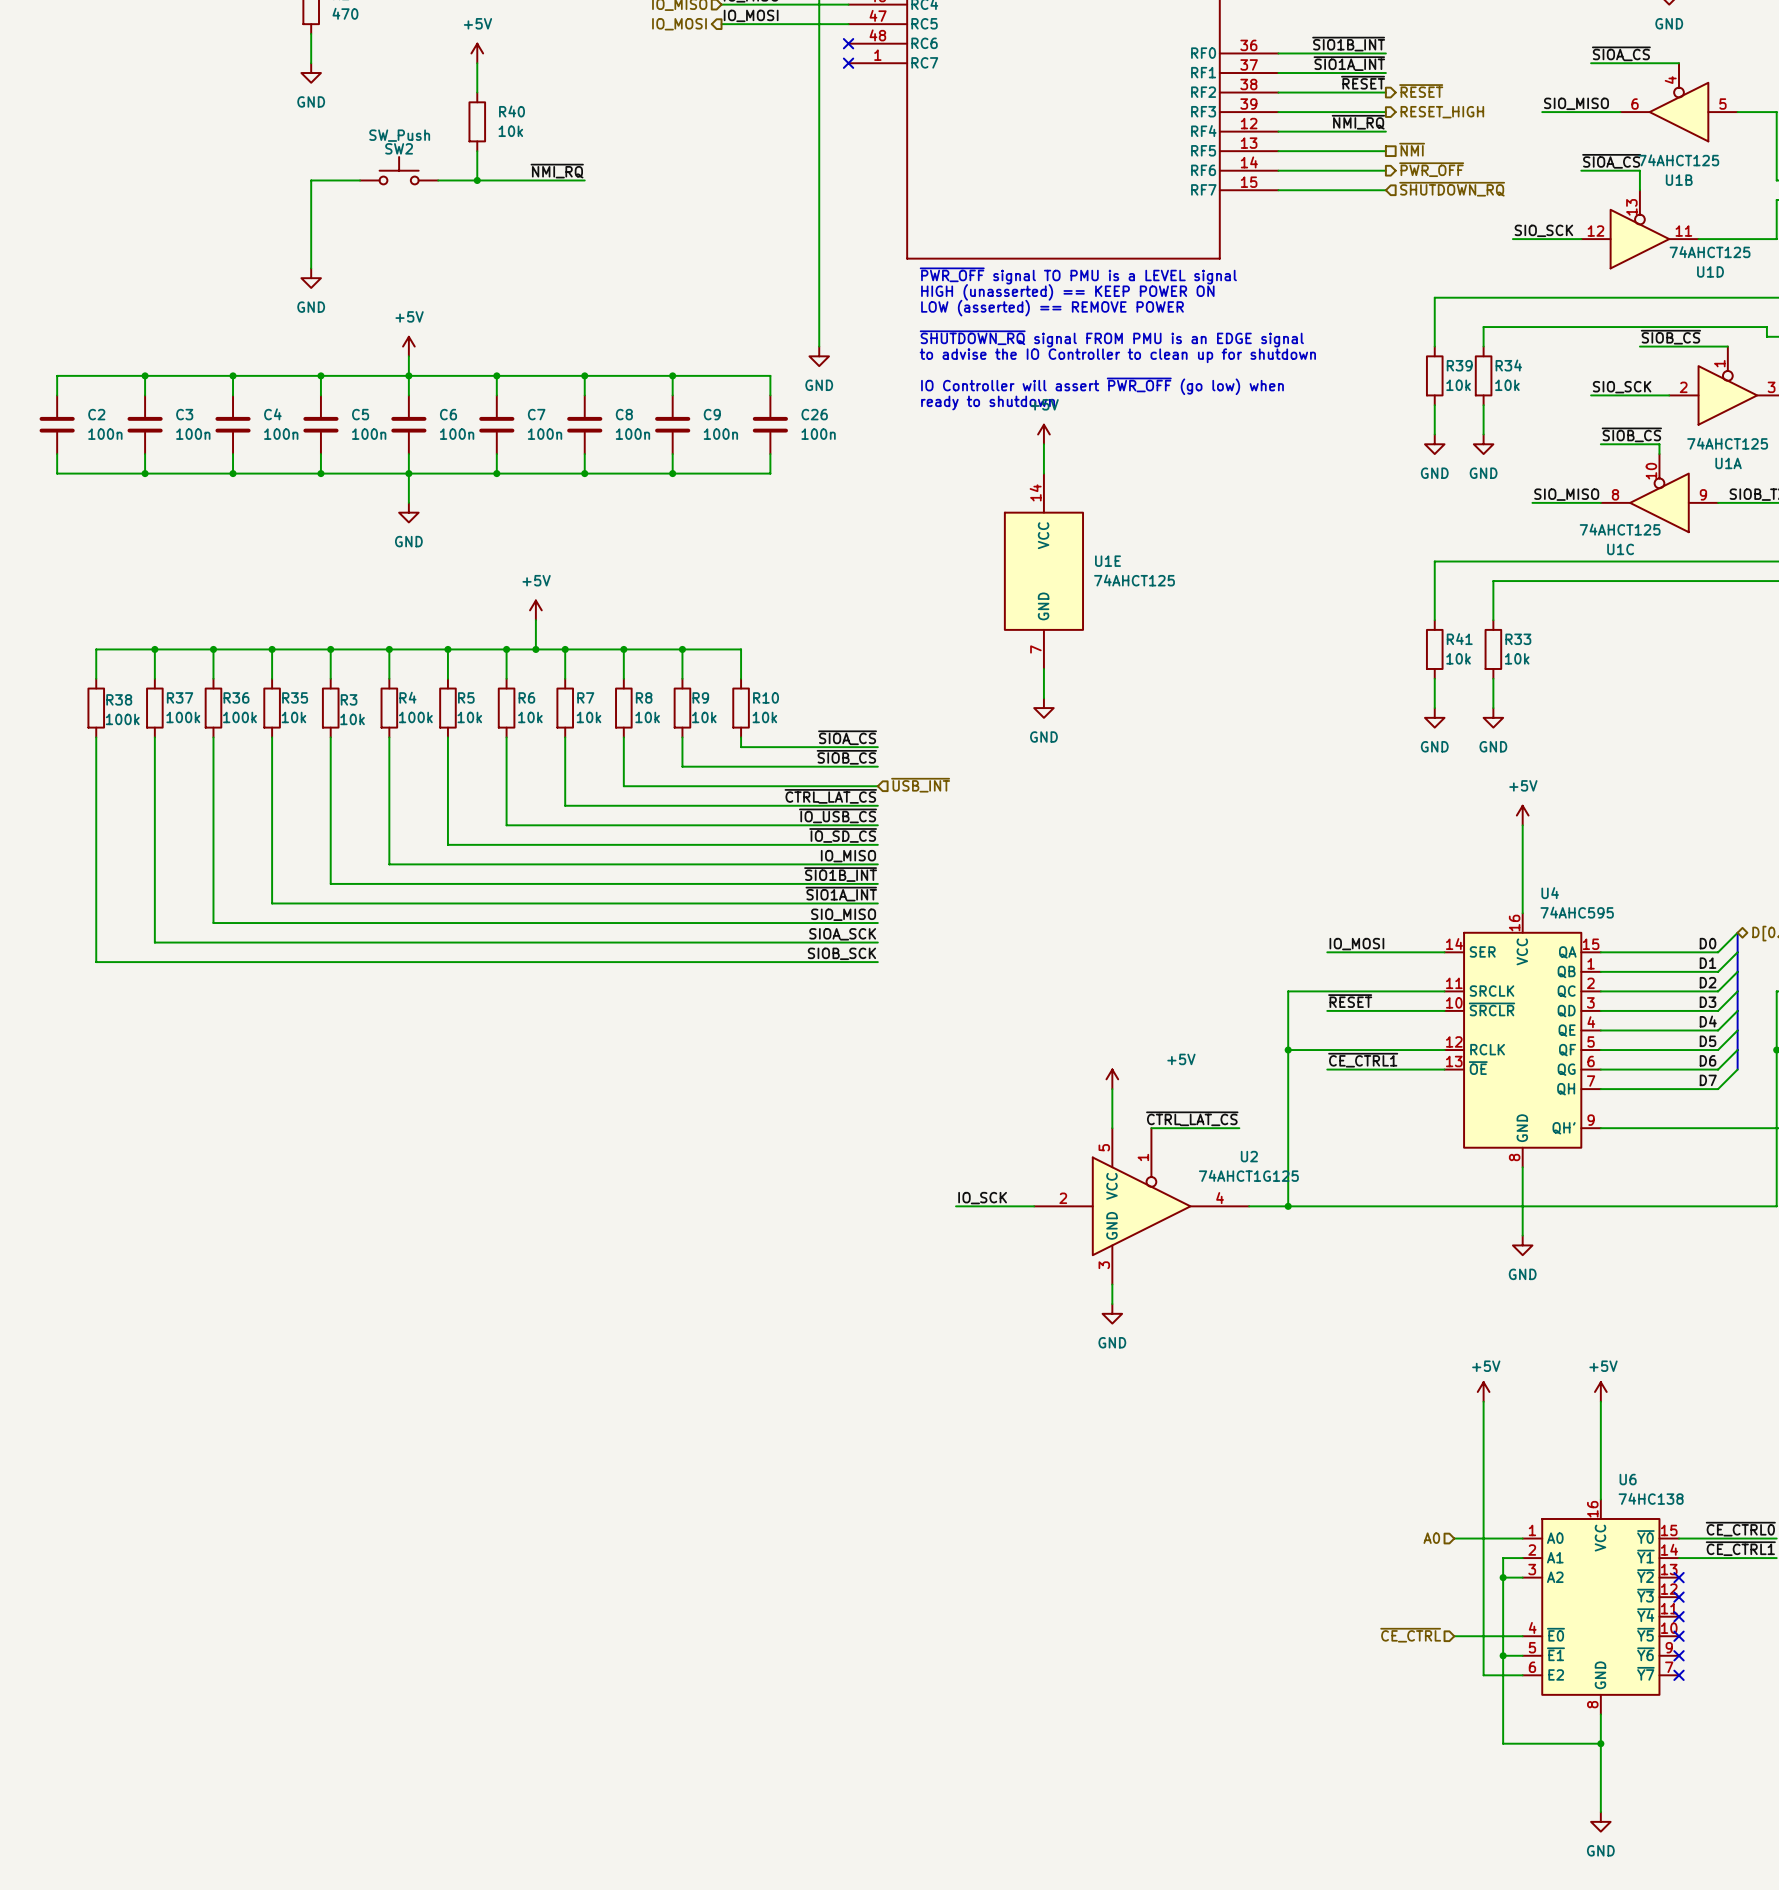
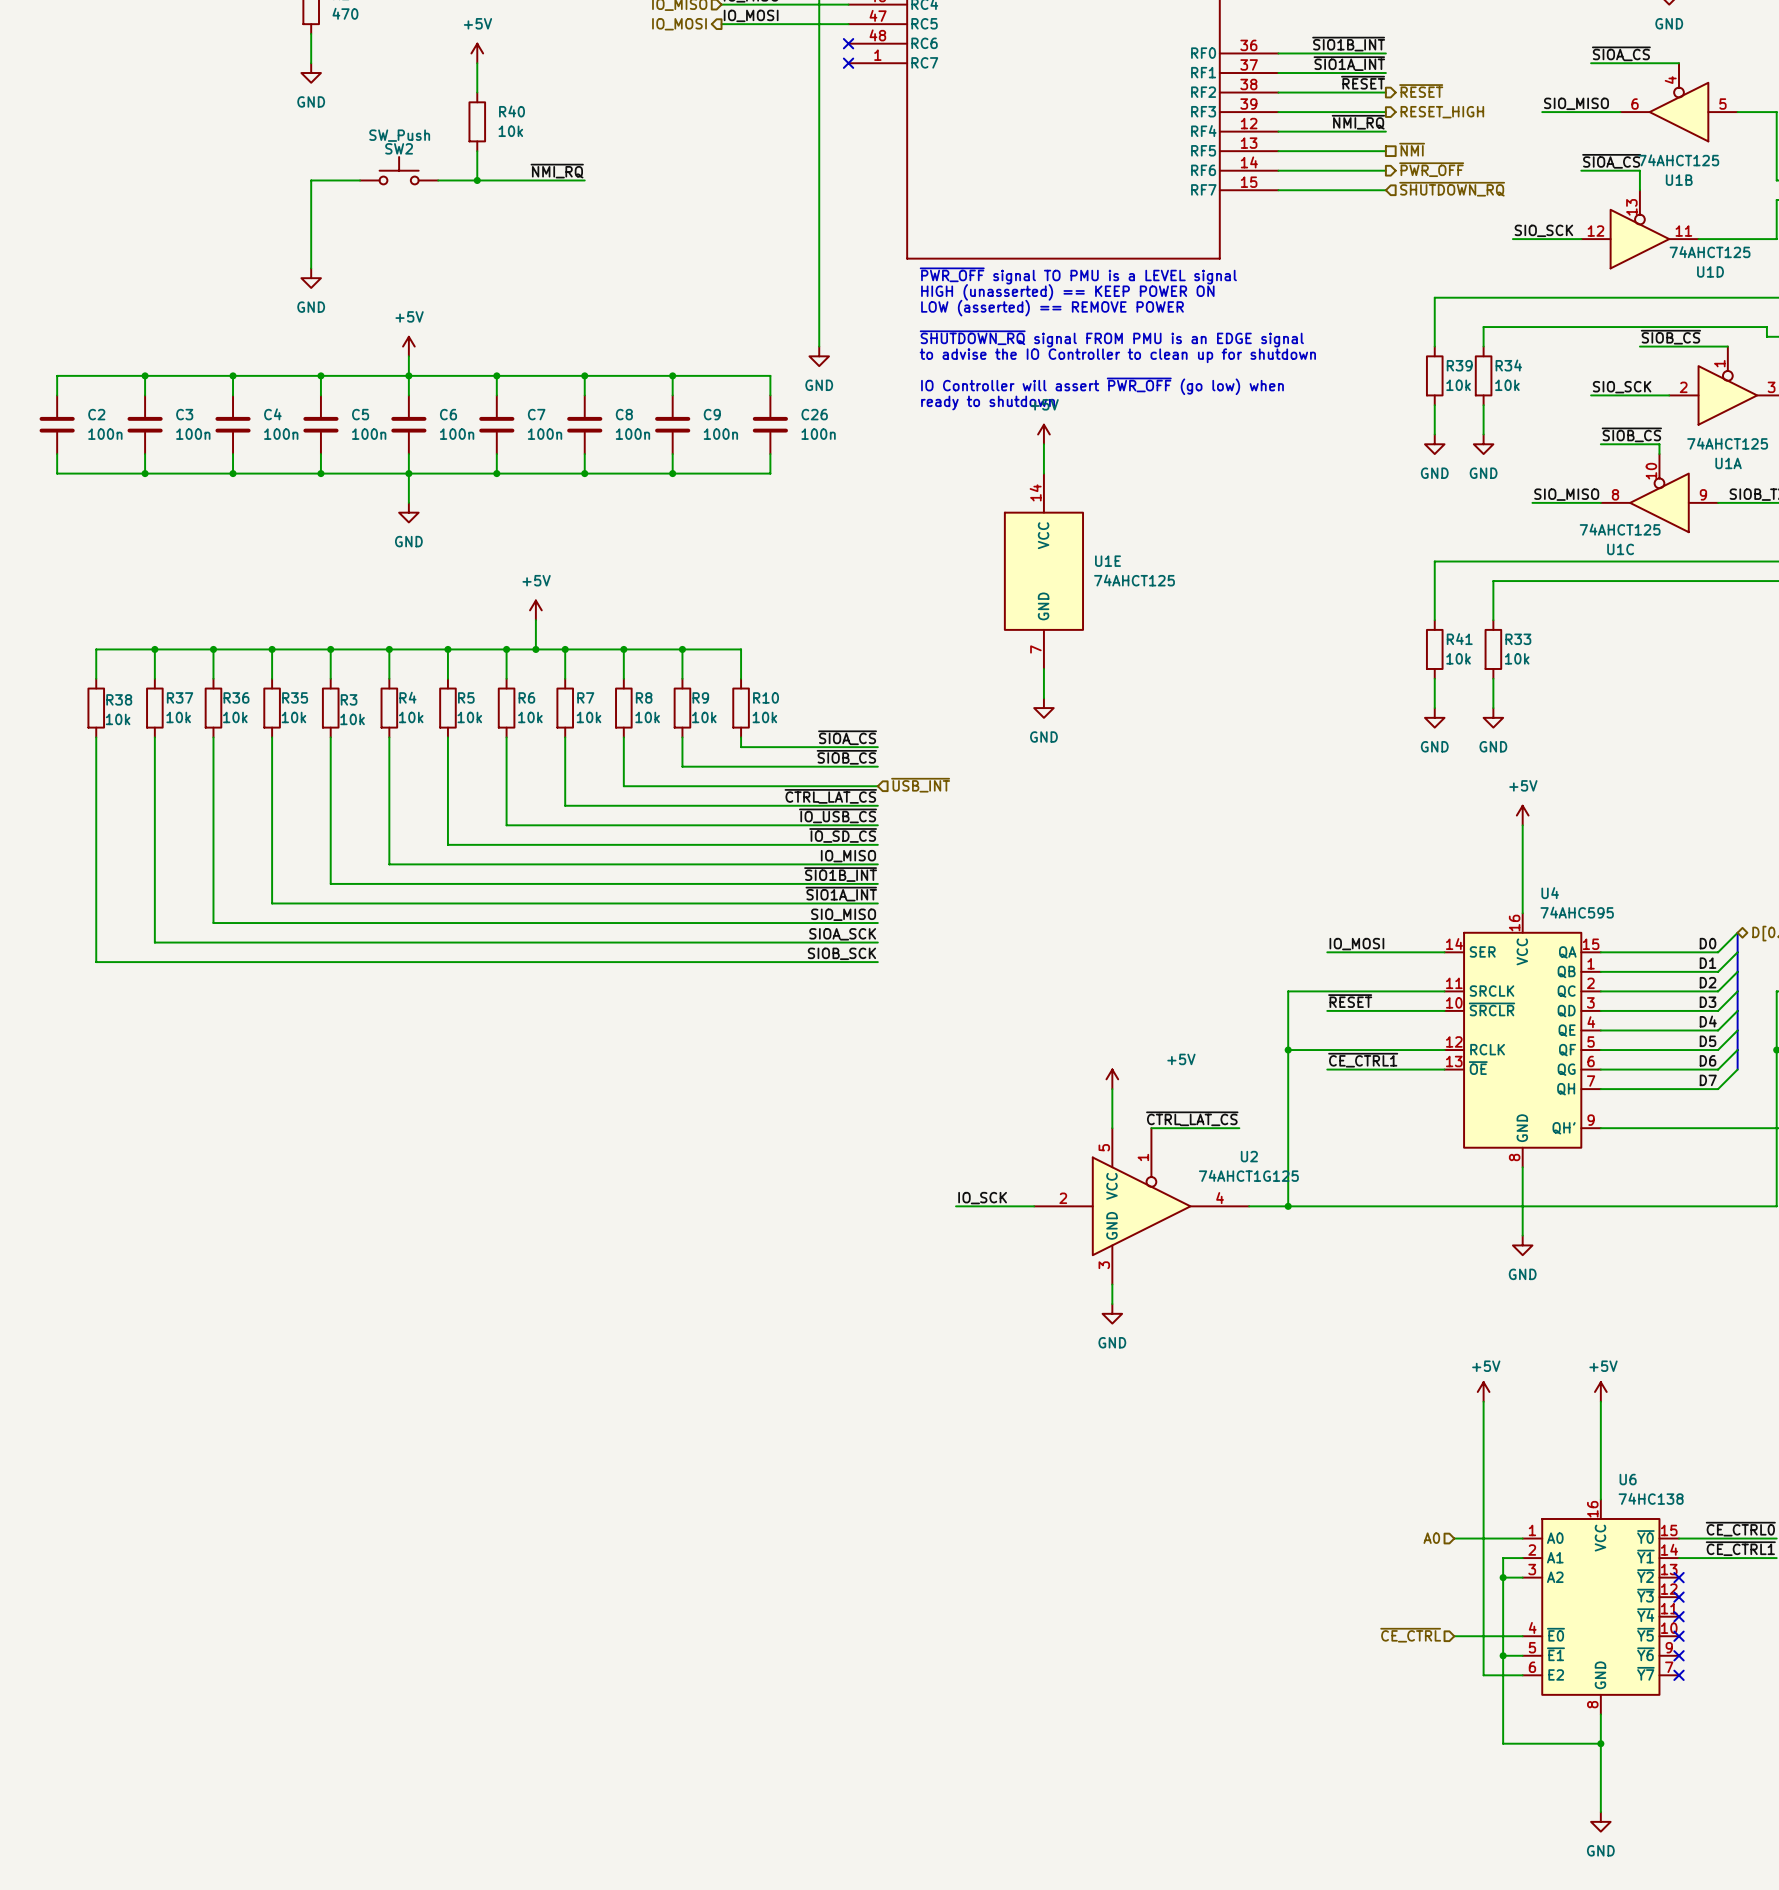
R37 value: 100k (183, 717) -> 10k (178, 717)
R36 value: 100k (239, 717) -> 10k (235, 717)
R4 value: 100k (415, 717) -> 10k (411, 717)
R38 value: 100k (122, 719) -> 10k (118, 719)

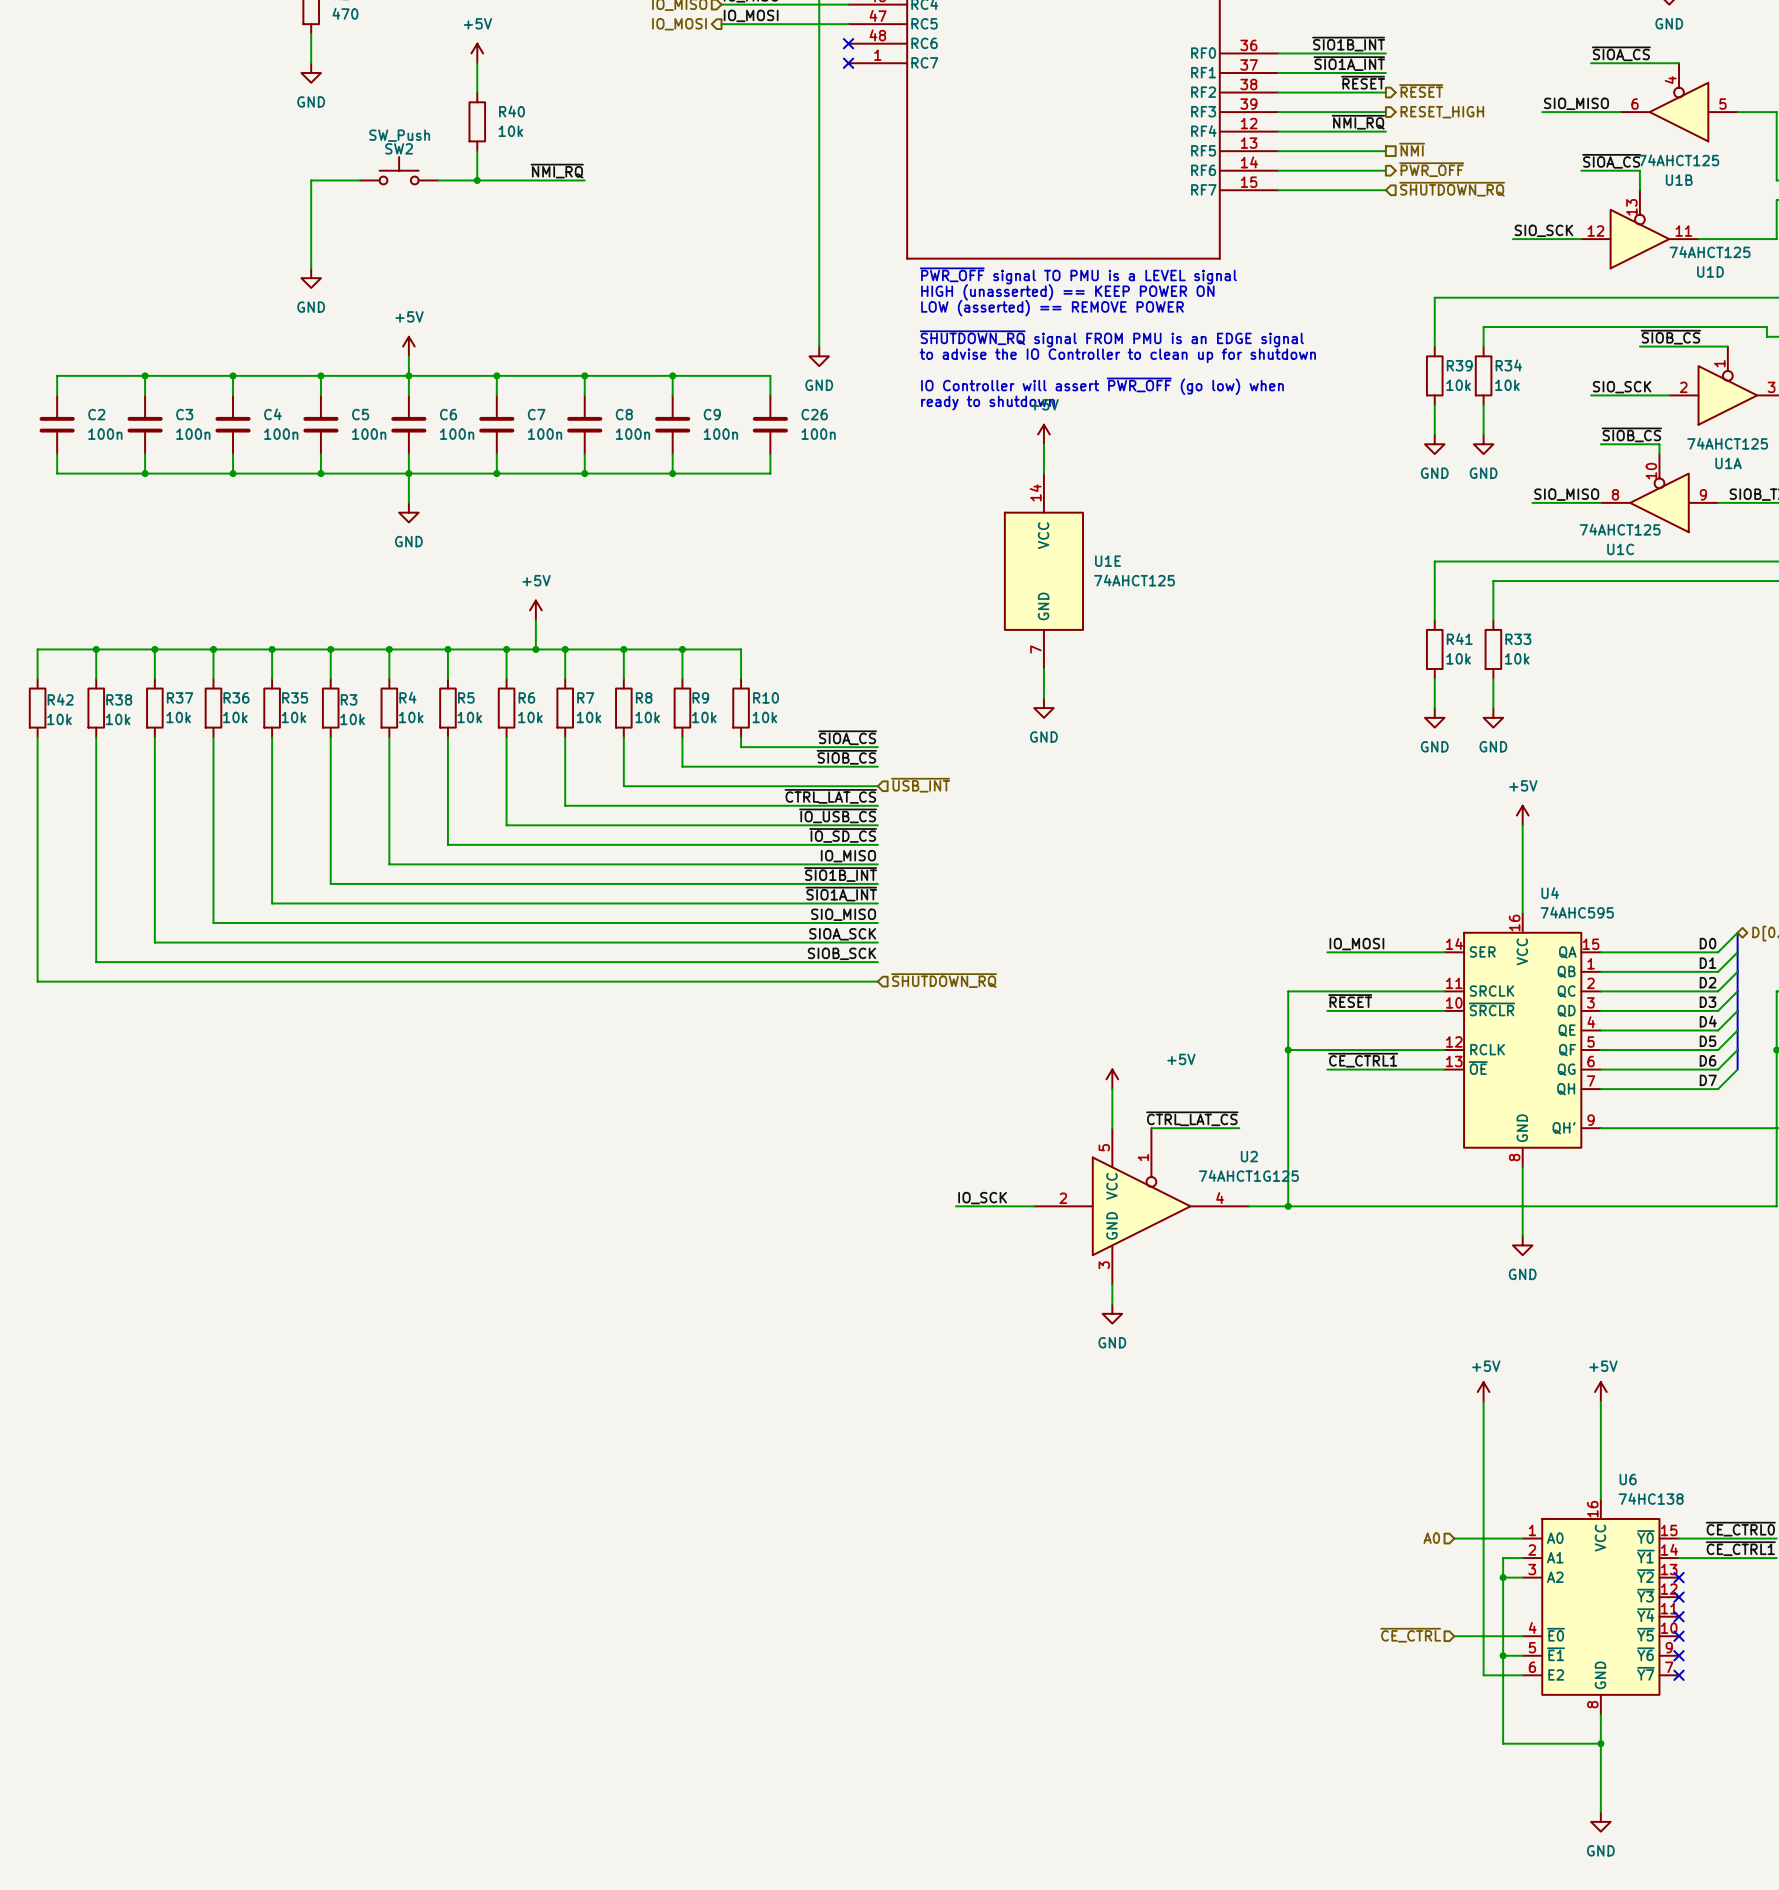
wire: none -> (96, 649) (37, 649) (37, 678)
junction: none -> (96, 649)
R42: none -> 10k (37, 708)
wire: none -> (37, 737) (37, 981) (877, 981)
hierarchical label: none -> ~{SHUTDOWN_RQ} (944, 980)

